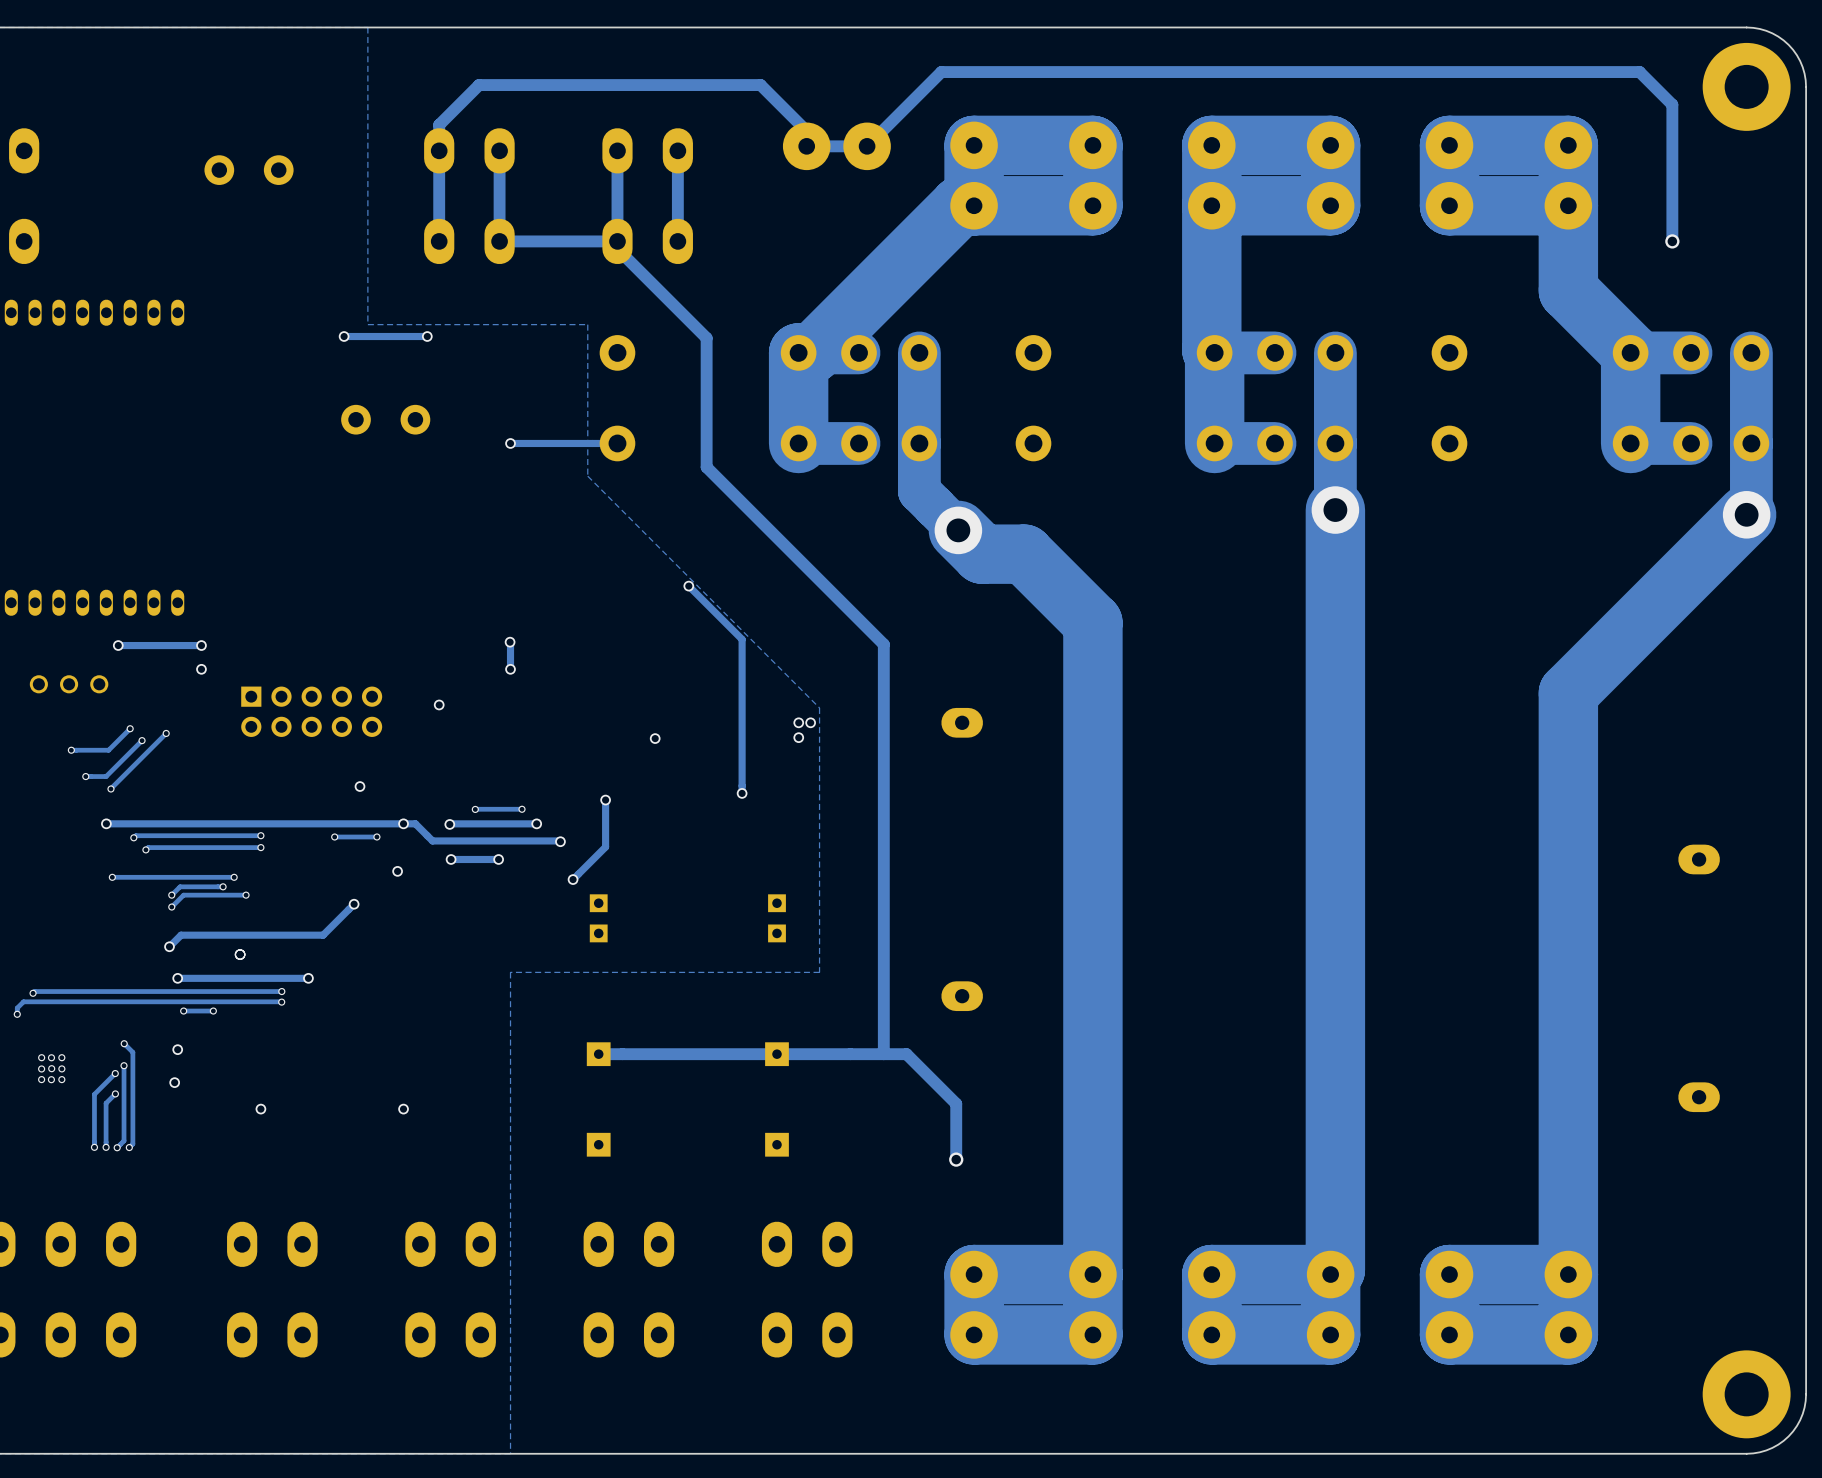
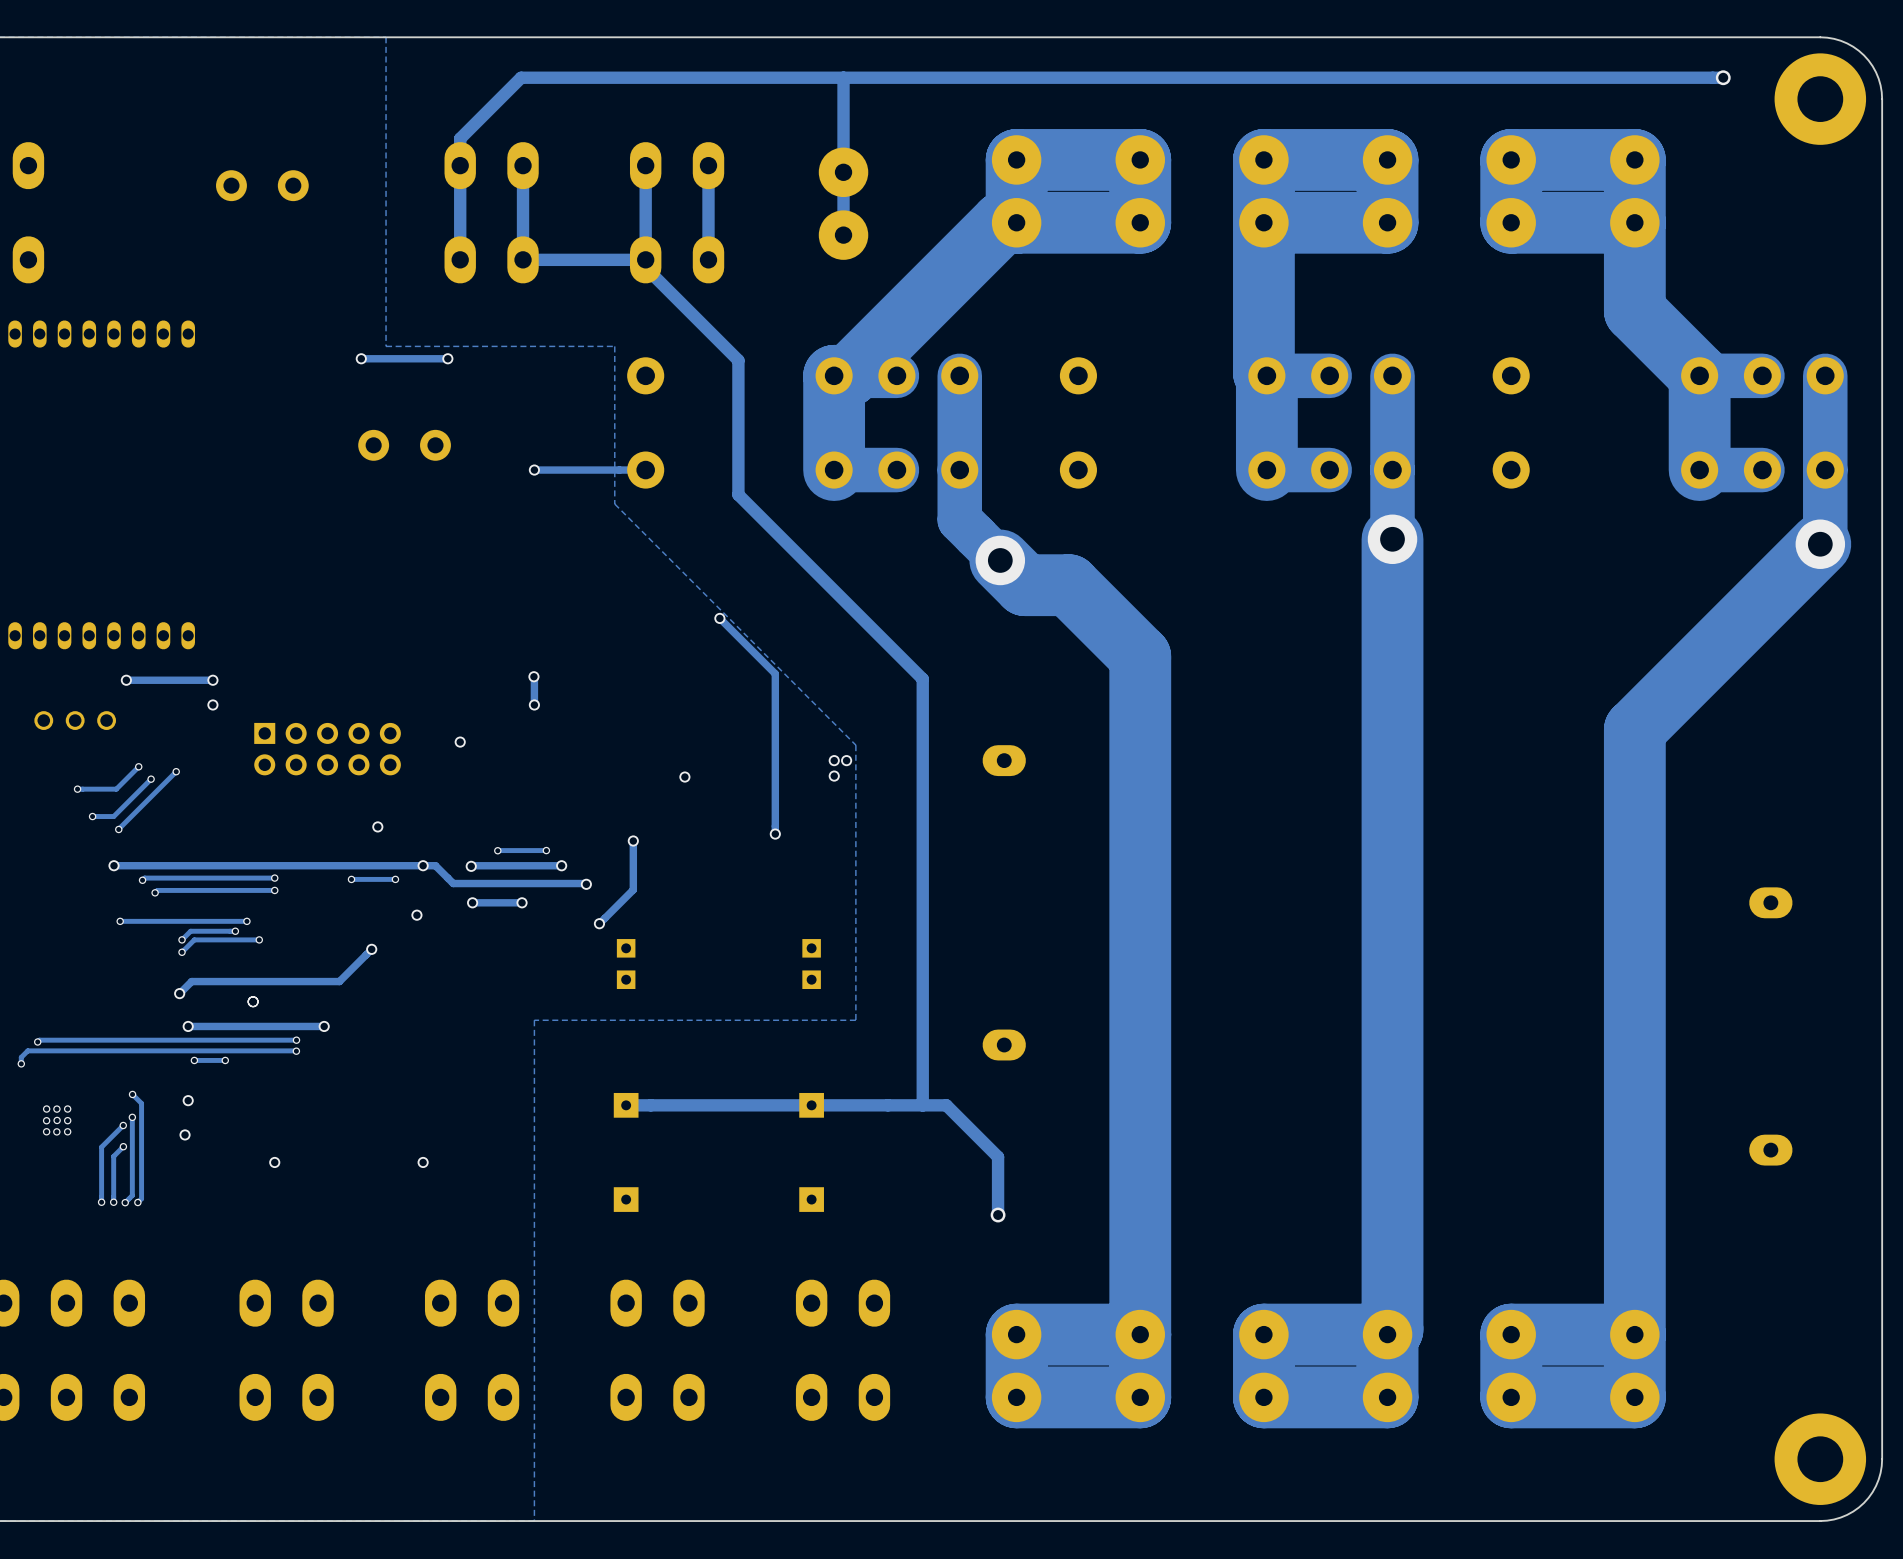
track: none -> (843, 77) (843, 235)
via: none -> (1723, 77)
track: (479, 85) (760, 85) (806, 131) (806, 146) (867, 146) (941, 72) (1639, 72) (1672, 104) (1672, 241) -> (501, 97) (521, 77) (1723, 77)
part rotation: 0° (836, 146) -> 90° clockwise (843, 203)
via: (1672, 241) -> none

